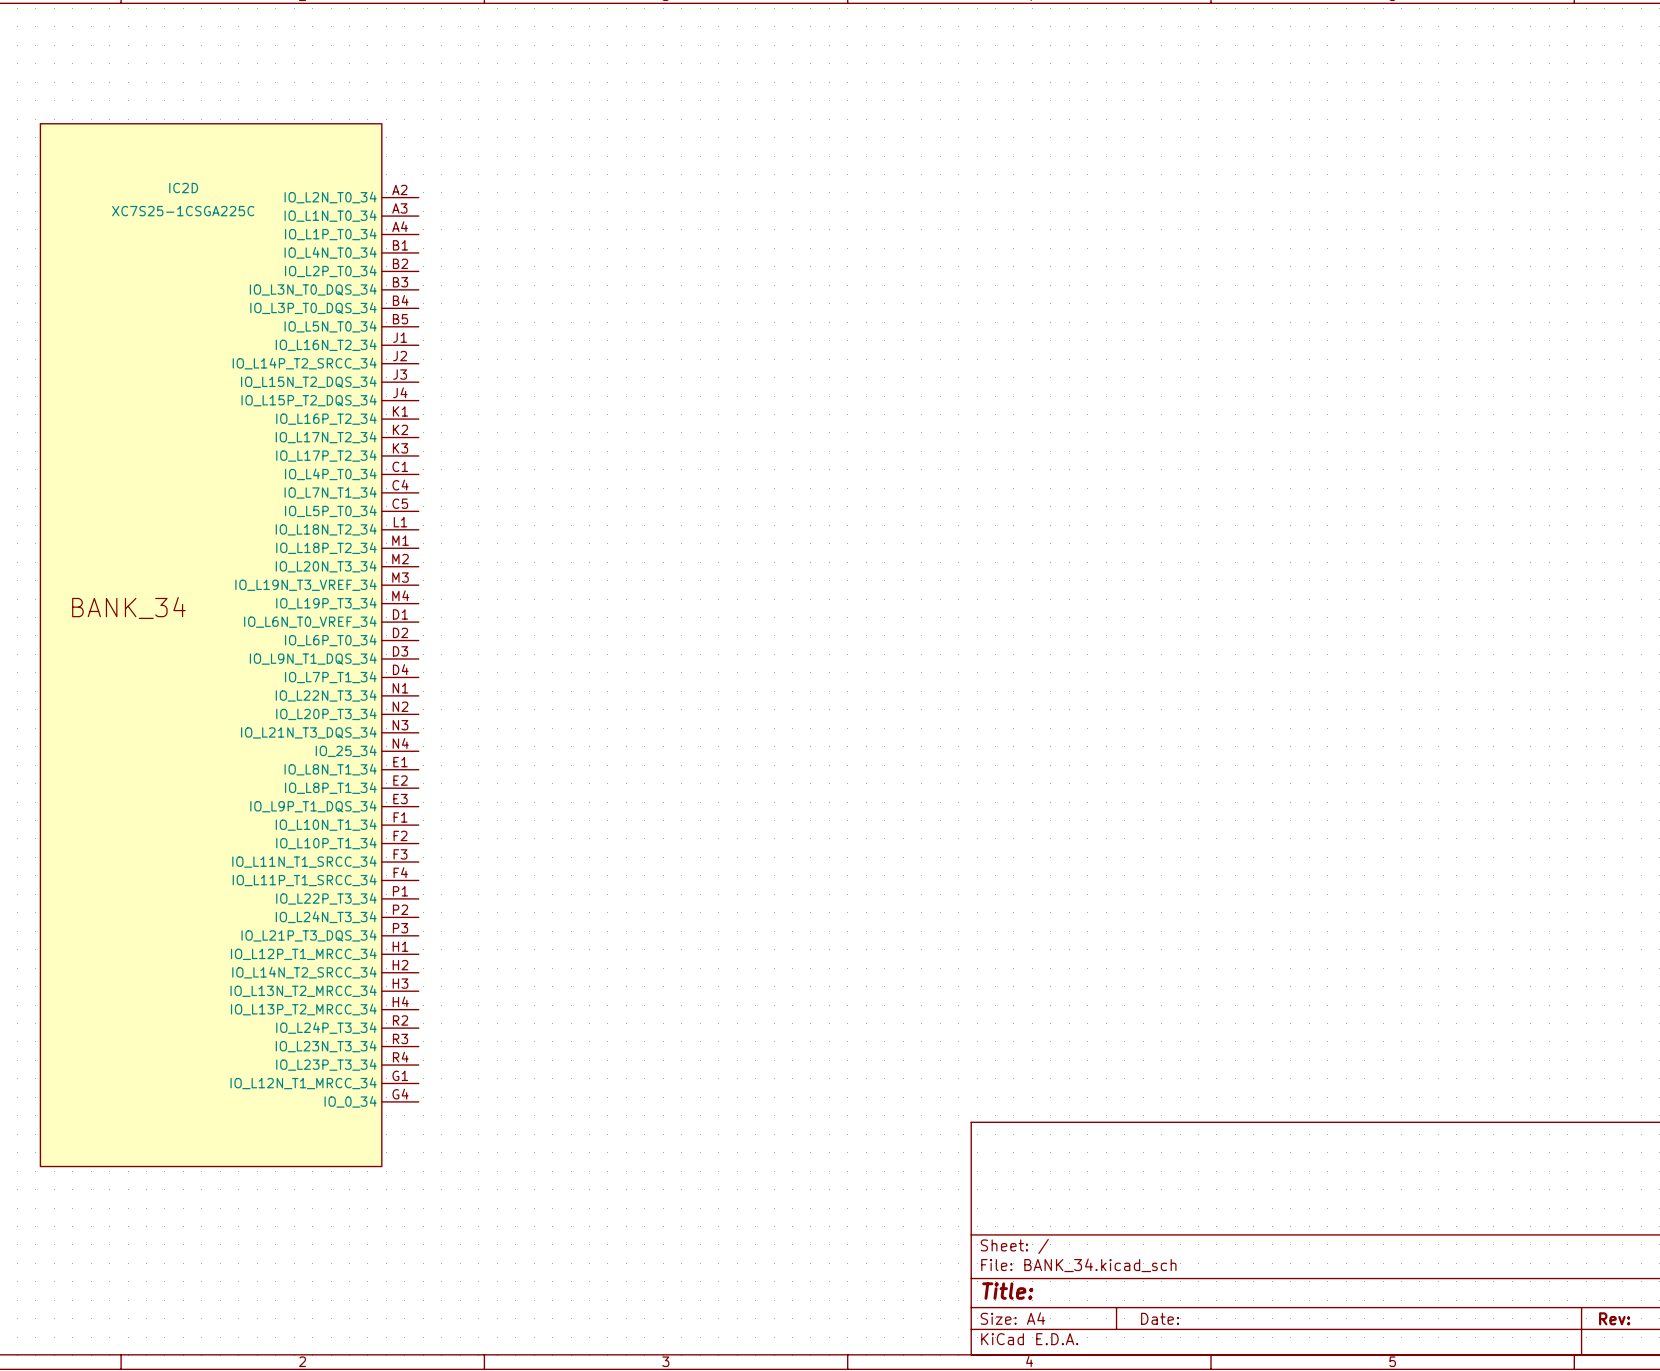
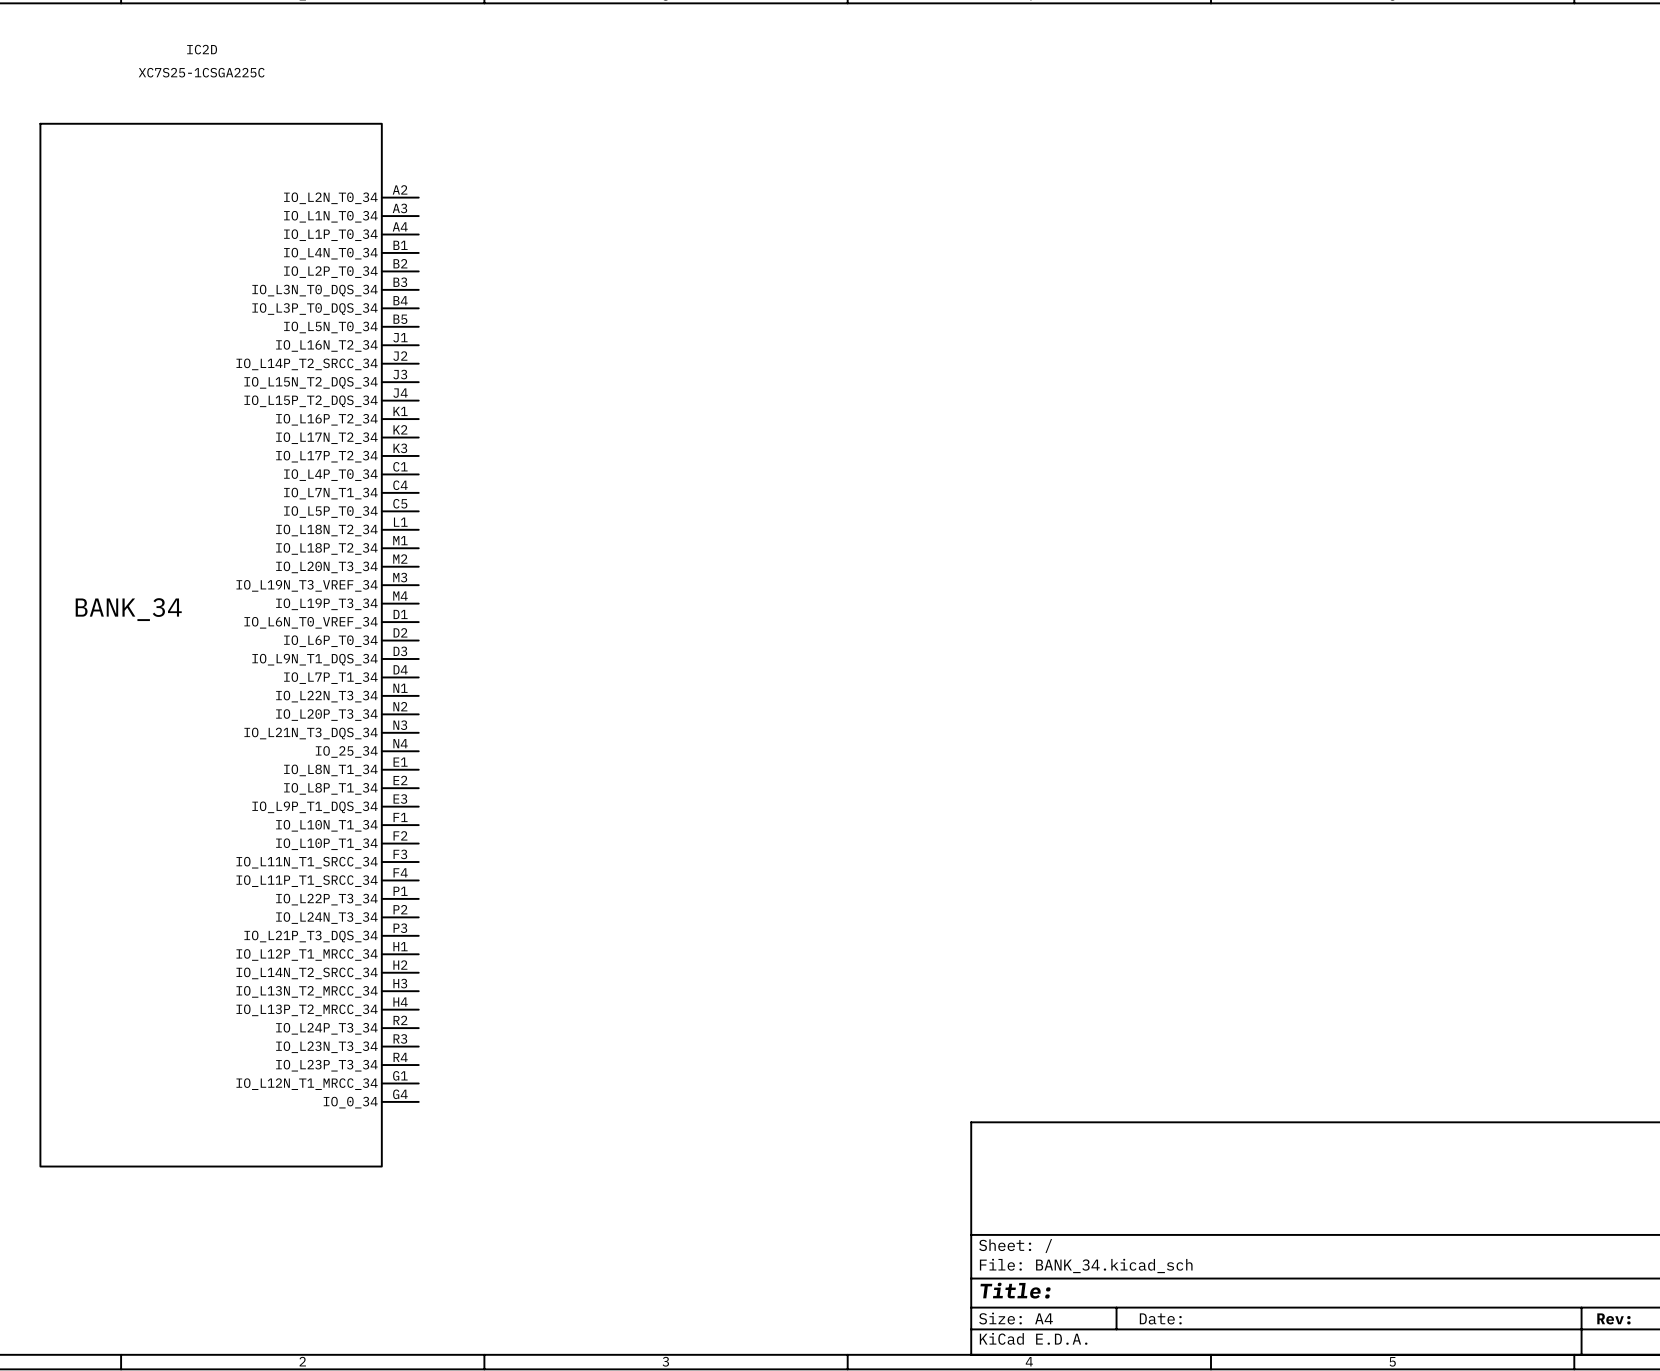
IC2D name position: IC2D (183, 188) -> IC2D (202, 49)
IC2D value position: XC7S25-1CSGA225C (183, 211) -> XC7S25-1CSGA225C (201, 72)

